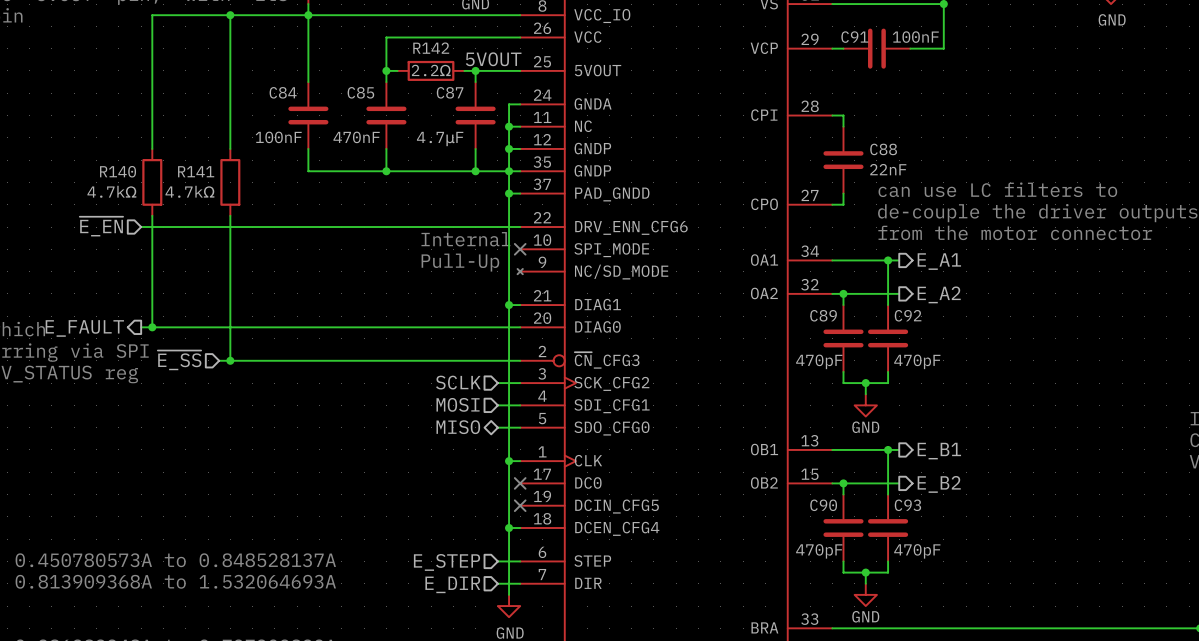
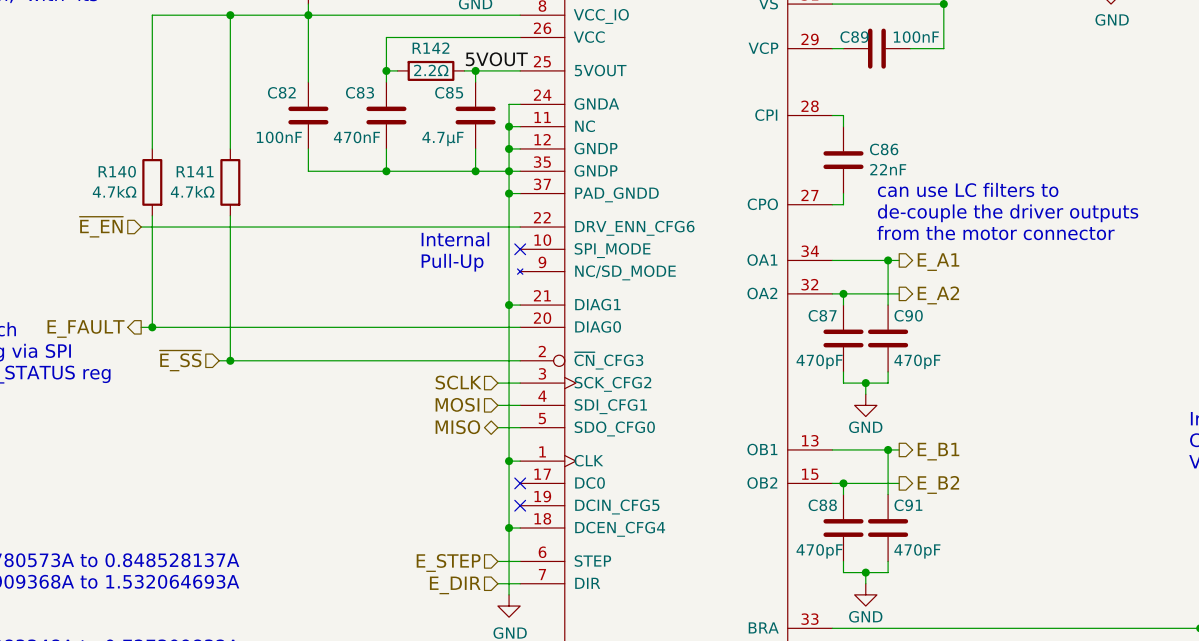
C91 name: C91 (854, 37) -> C89 (854, 37)
C84 name: C84 (283, 92) -> C82 (281, 92)
C85 name: C85 (360, 92) -> C83 (360, 92)
C87 name: C87 (450, 92) -> C85 (449, 92)
C88 name: C88 (883, 149) -> C86 (884, 149)
C89 name: C89 (823, 315) -> C87 (822, 315)
C92 name: C92 (908, 315) -> C90 (908, 315)
C90 name: C90 (823, 505) -> C88 (822, 505)
C93 name: C93 (907, 505) -> C91 (908, 505)

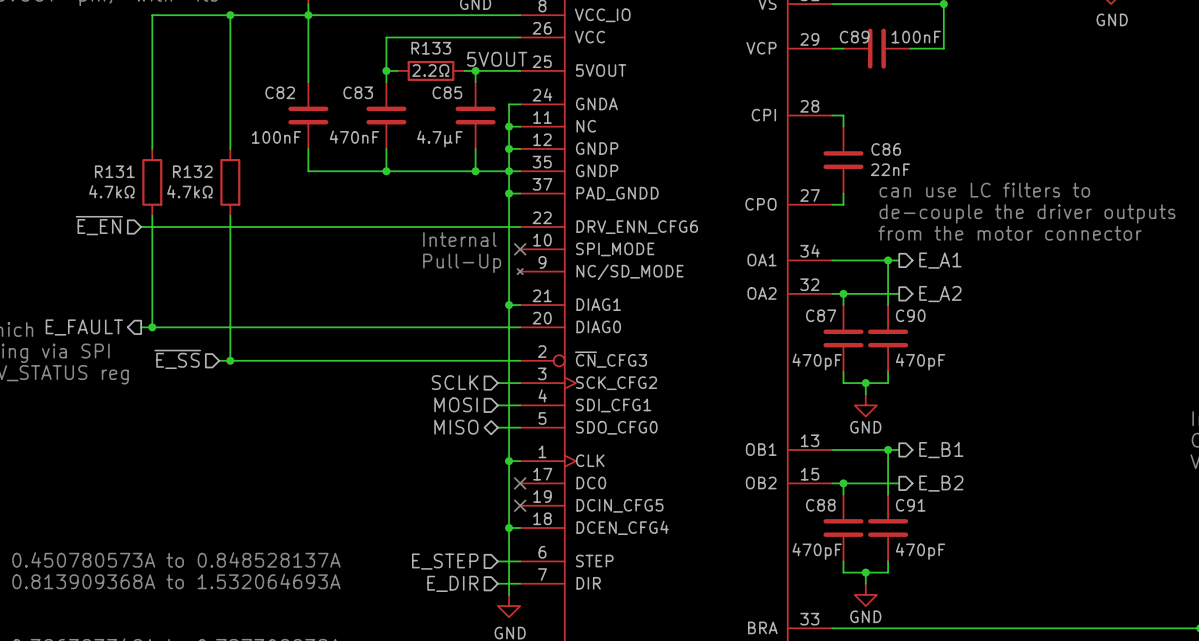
R142 name: R142 (430, 48) -> R133 (431, 48)
R140 name: R140 (117, 171) -> R131 (114, 171)
R141 name: R141 (195, 171) -> R132 (192, 171)

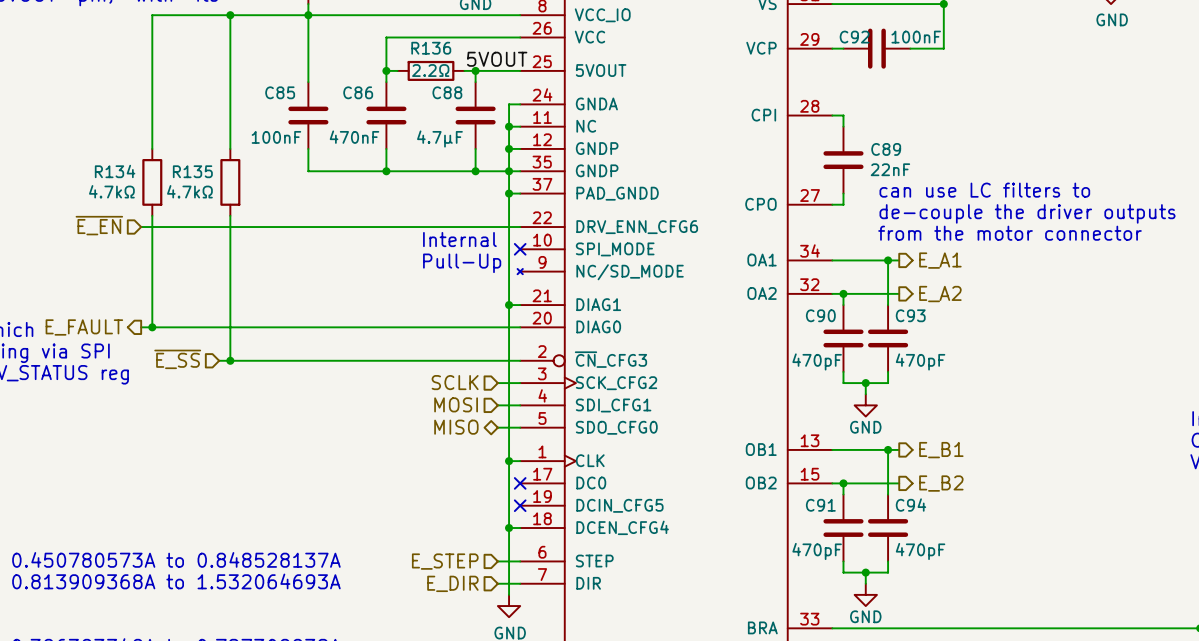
C89 name: C89 (854, 37) -> C92 (854, 37)
R133 name: R133 (431, 48) -> R136 (431, 48)
C82 name: C82 (280, 92) -> C85 (280, 92)
C83 name: C83 (358, 92) -> C86 (358, 92)
C85 name: C85 (447, 92) -> C88 (447, 92)
C86 name: C86 (886, 149) -> C89 (886, 149)
R131 name: R131 (114, 171) -> R134 (115, 171)
R132 name: R132 (192, 171) -> R135 (192, 171)
C87 name: C87 (821, 315) -> C90 (820, 315)
C90 name: C90 (910, 315) -> C93 (910, 315)
C88 name: C88 (820, 505) -> C91 (820, 505)
C91 name: C91 (910, 505) -> C94 (910, 505)

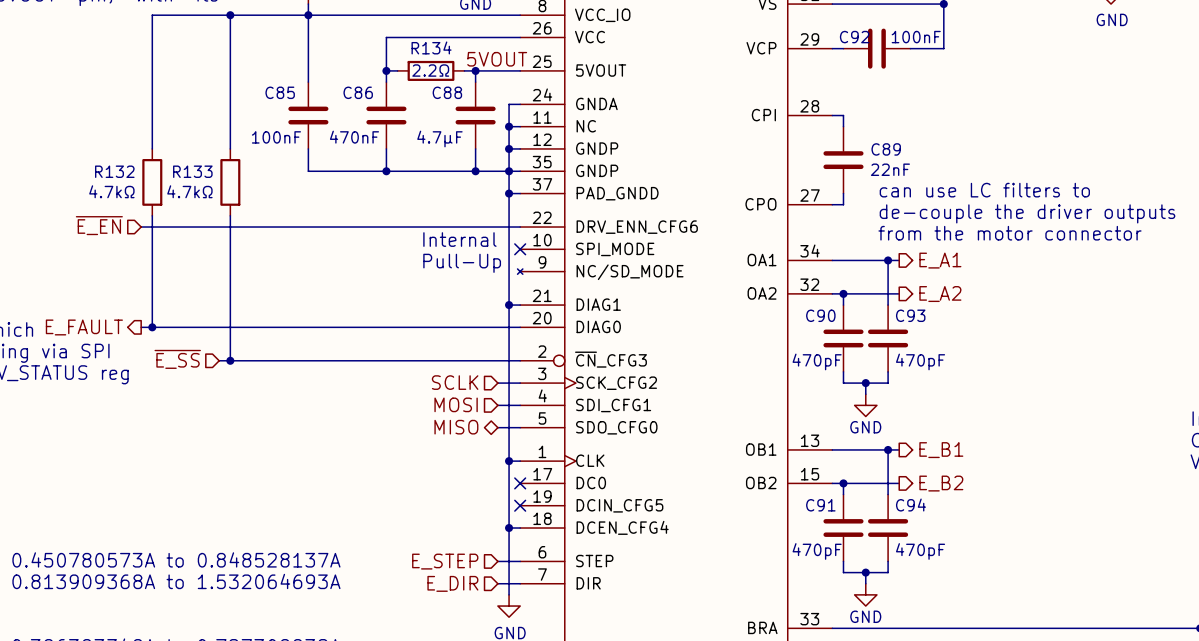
R136 name: R136 (431, 48) -> R134 (431, 47)
R134 name: R134 (115, 171) -> R132 (114, 171)
R135 name: R135 (192, 171) -> R133 (192, 171)

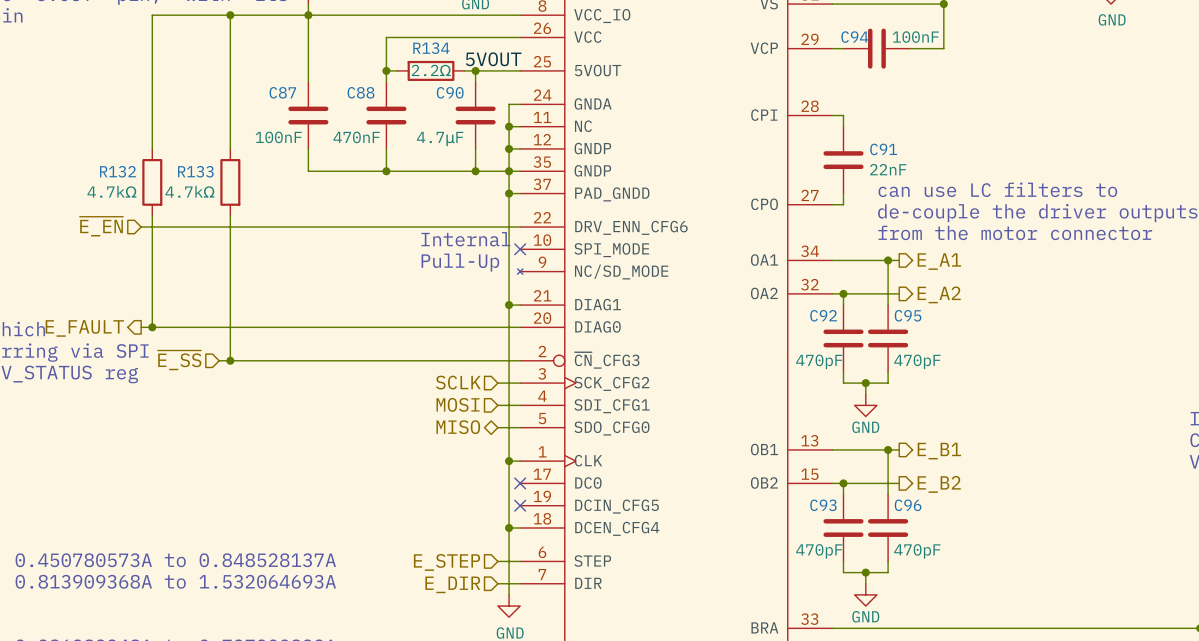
C92 name: C92 (854, 37) -> C94 (854, 37)
C85 name: C85 (280, 92) -> C87 (282, 92)
C86 name: C86 (358, 92) -> C88 (361, 92)
C88 name: C88 (447, 92) -> C90 (450, 92)
C89 name: C89 (886, 149) -> C91 (883, 149)
C90 name: C90 (820, 315) -> C92 (823, 315)
C93 name: C93 (910, 315) -> C95 (908, 315)
C91 name: C91 (820, 505) -> C93 (823, 505)
C94 name: C94 (910, 505) -> C96 (908, 505)

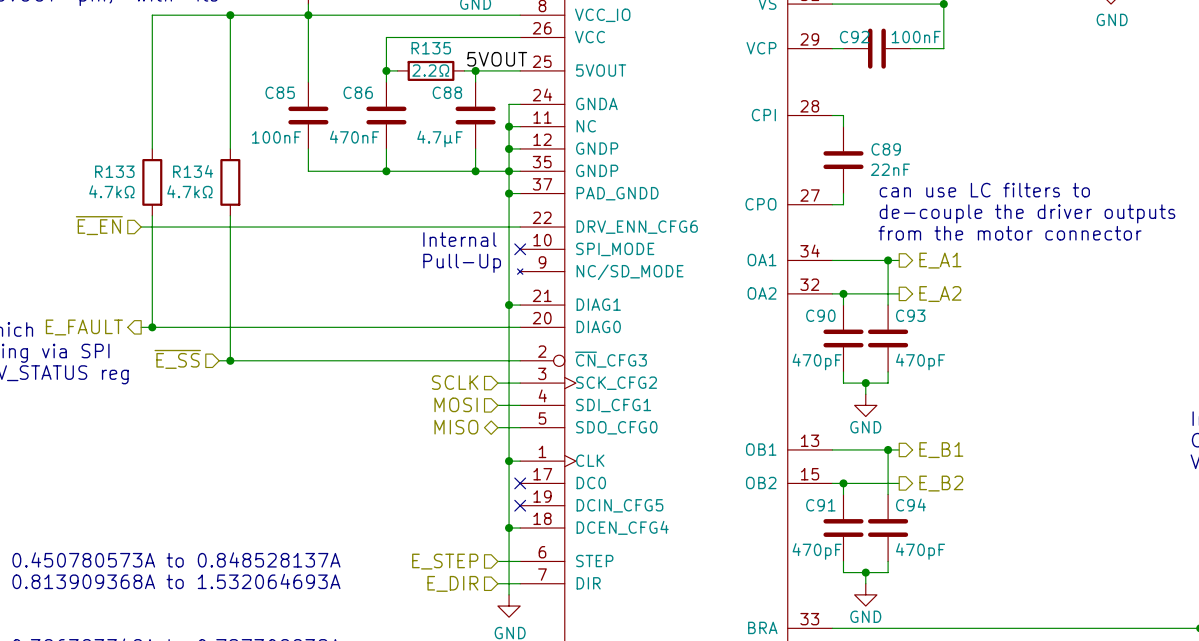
C94 name: C94 (854, 37) -> C92 (854, 37)
R134 name: R134 (431, 48) -> R135 (431, 48)
C87 name: C87 (282, 92) -> C85 (280, 92)
C88 name: C88 (361, 92) -> C86 (358, 92)
C90 name: C90 (450, 92) -> C88 (447, 92)
C91 name: C91 (883, 149) -> C89 (886, 149)
R132 name: R132 (117, 171) -> R133 (114, 171)
R133 name: R133 (195, 171) -> R134 (193, 171)
C92 name: C92 (823, 315) -> C90 (820, 315)
C95 name: C95 (908, 315) -> C93 (910, 315)
C93 name: C93 (823, 505) -> C91 (820, 505)
C96 name: C96 (908, 505) -> C94 (910, 505)

